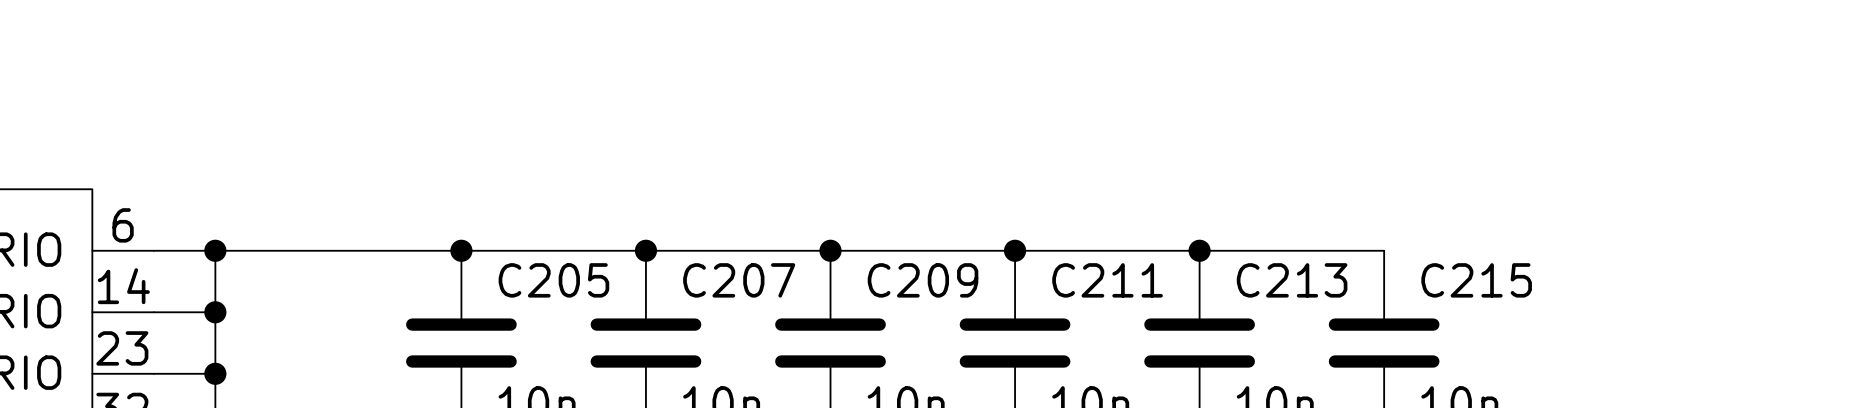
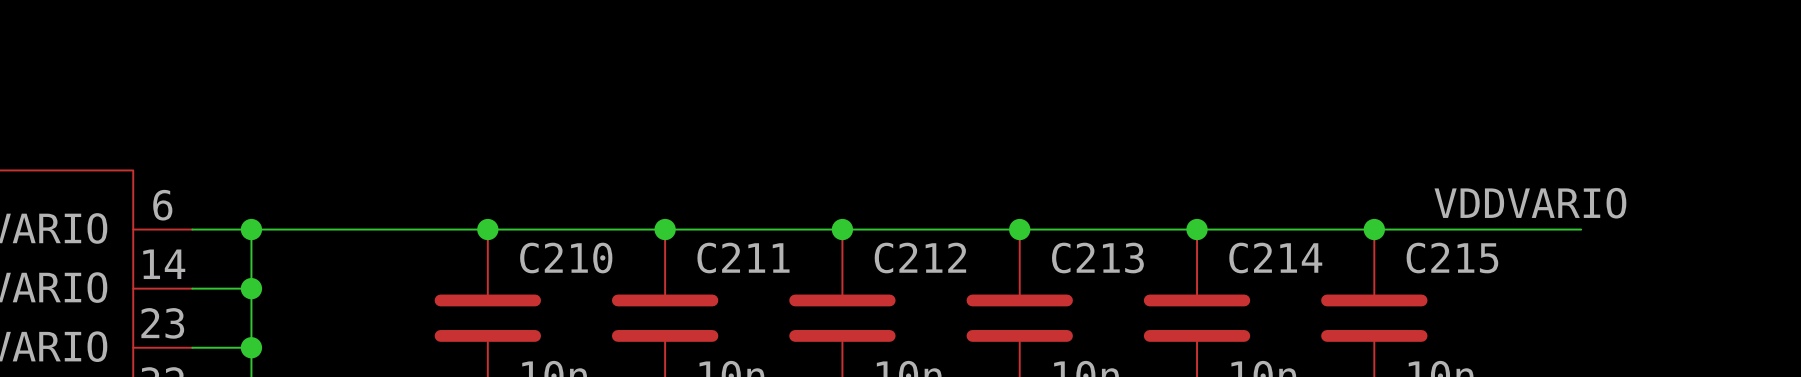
label: none -> VDDVARIO (1530, 203)
wire: none -> (1374, 229) (1581, 229)
junction: none -> (1374, 229)
C205 name: C205 (553, 280) -> C210 (566, 258)
C207 name: C207 (739, 280) -> C211 (743, 258)
C209 name: C209 (923, 280) -> C212 (920, 258)
C211 name: C211 (1107, 280) -> C213 (1097, 258)
C213 name: C213 (1292, 280) -> C214 (1275, 258)

